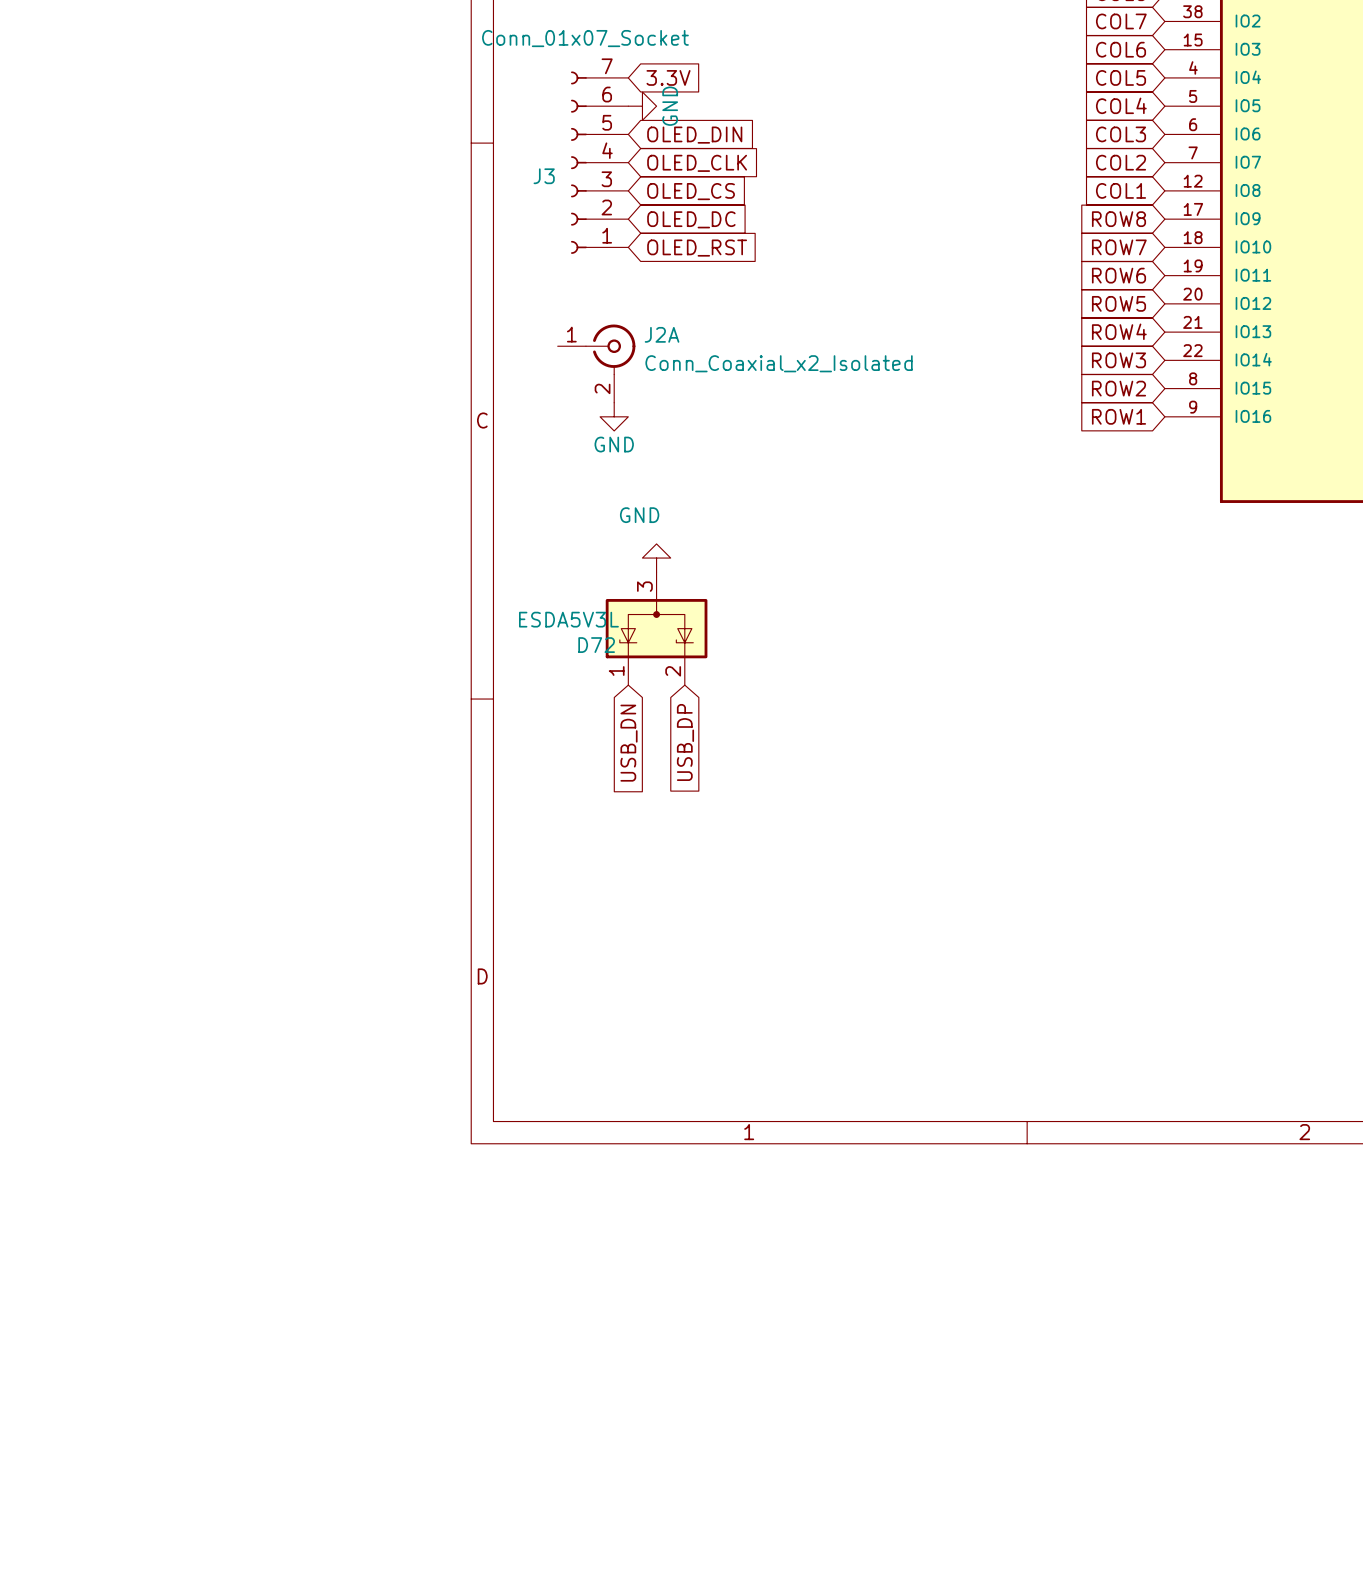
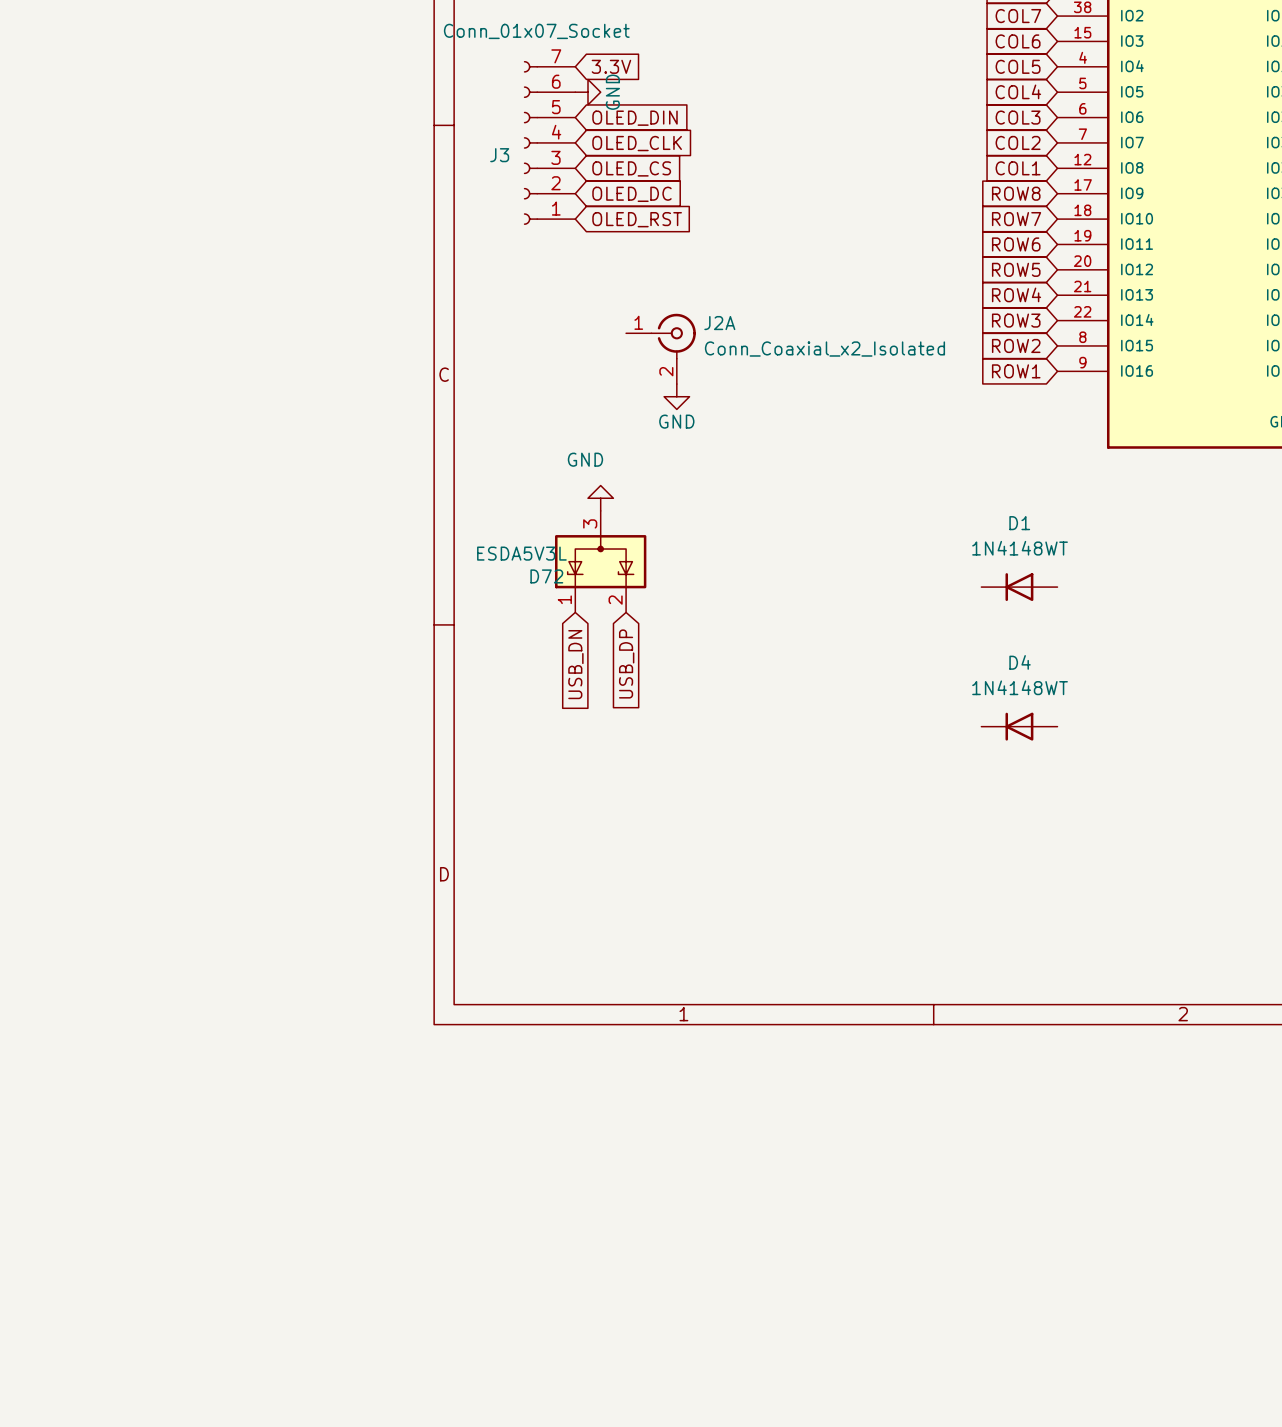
J2A position: (596, 363) -> (660, 348)
power symbol position: GND (614, 416) -> GND (676, 396)
D1: none -> 1N4148WT (1019, 587)
D4: none -> 1N4148WT (1019, 726)

